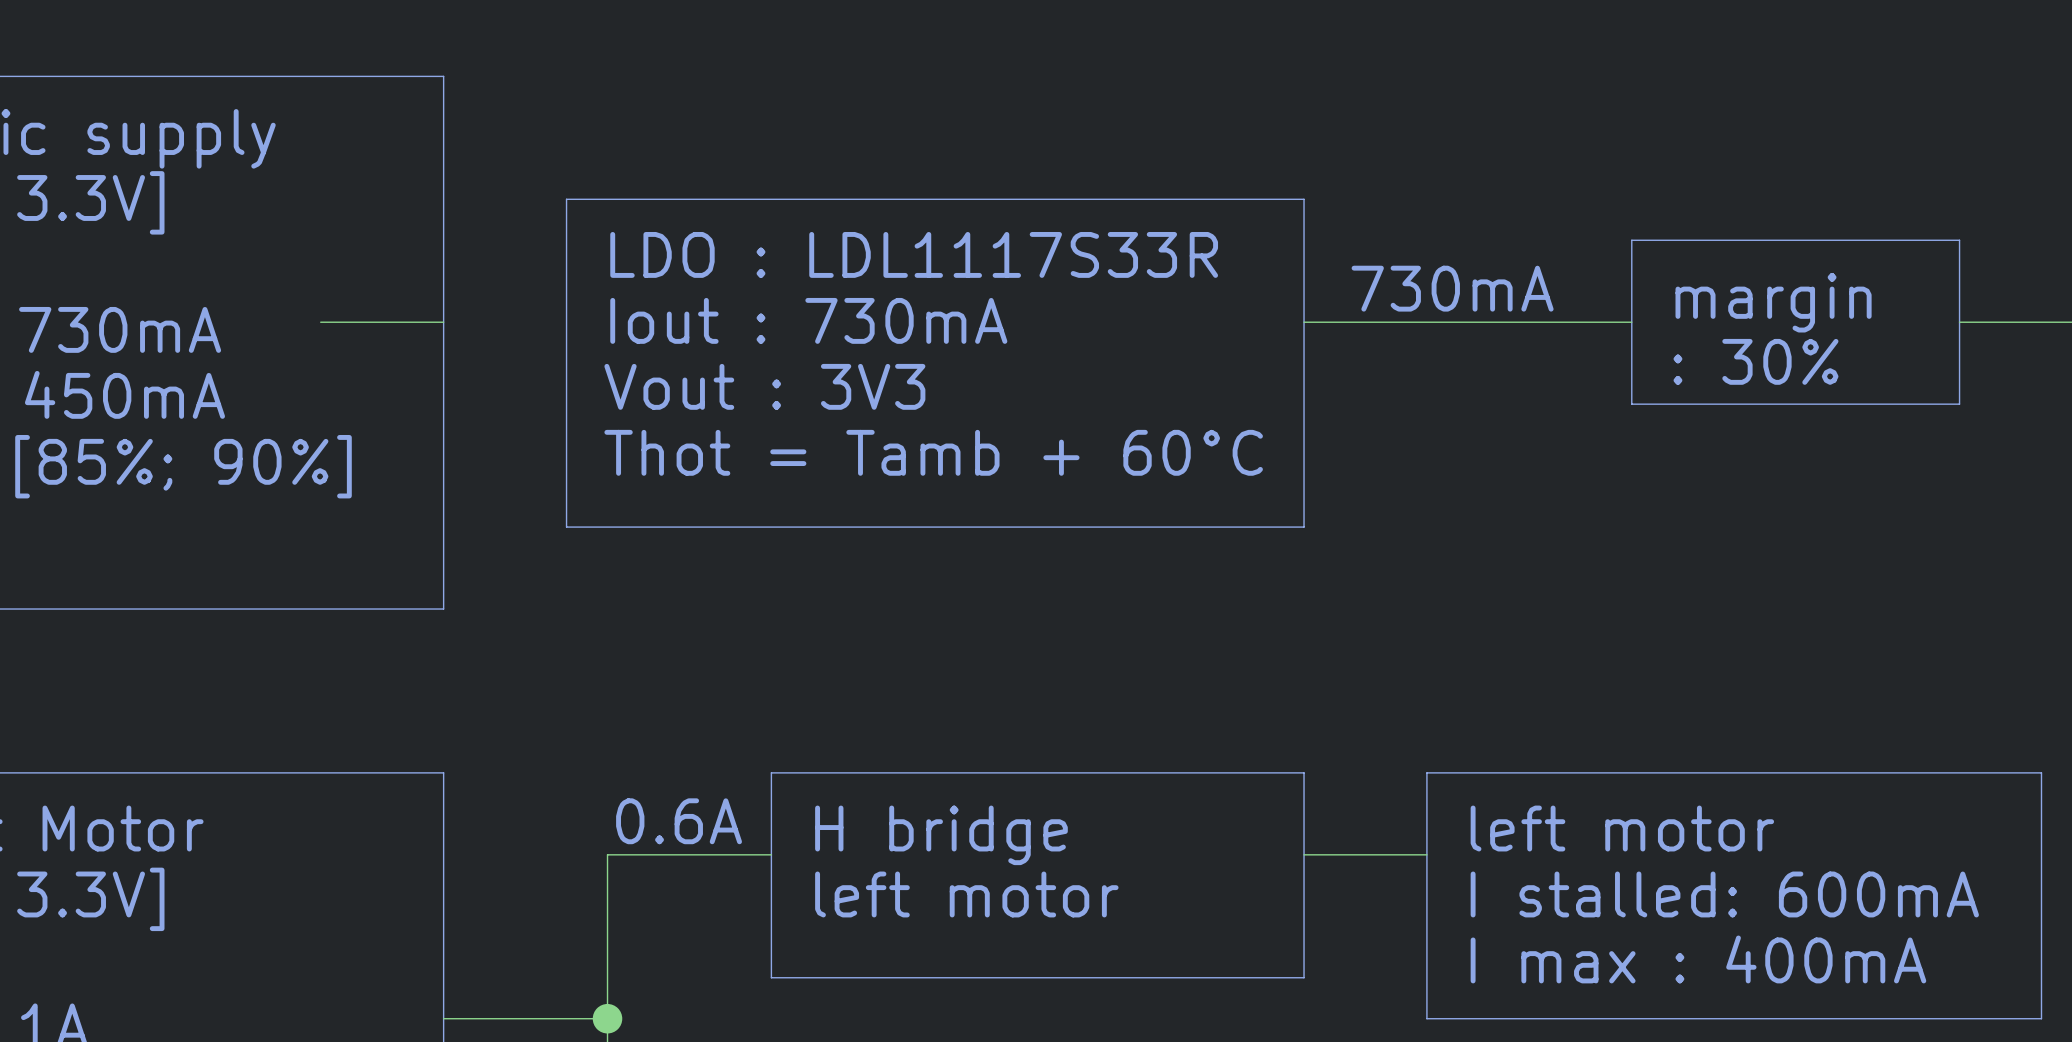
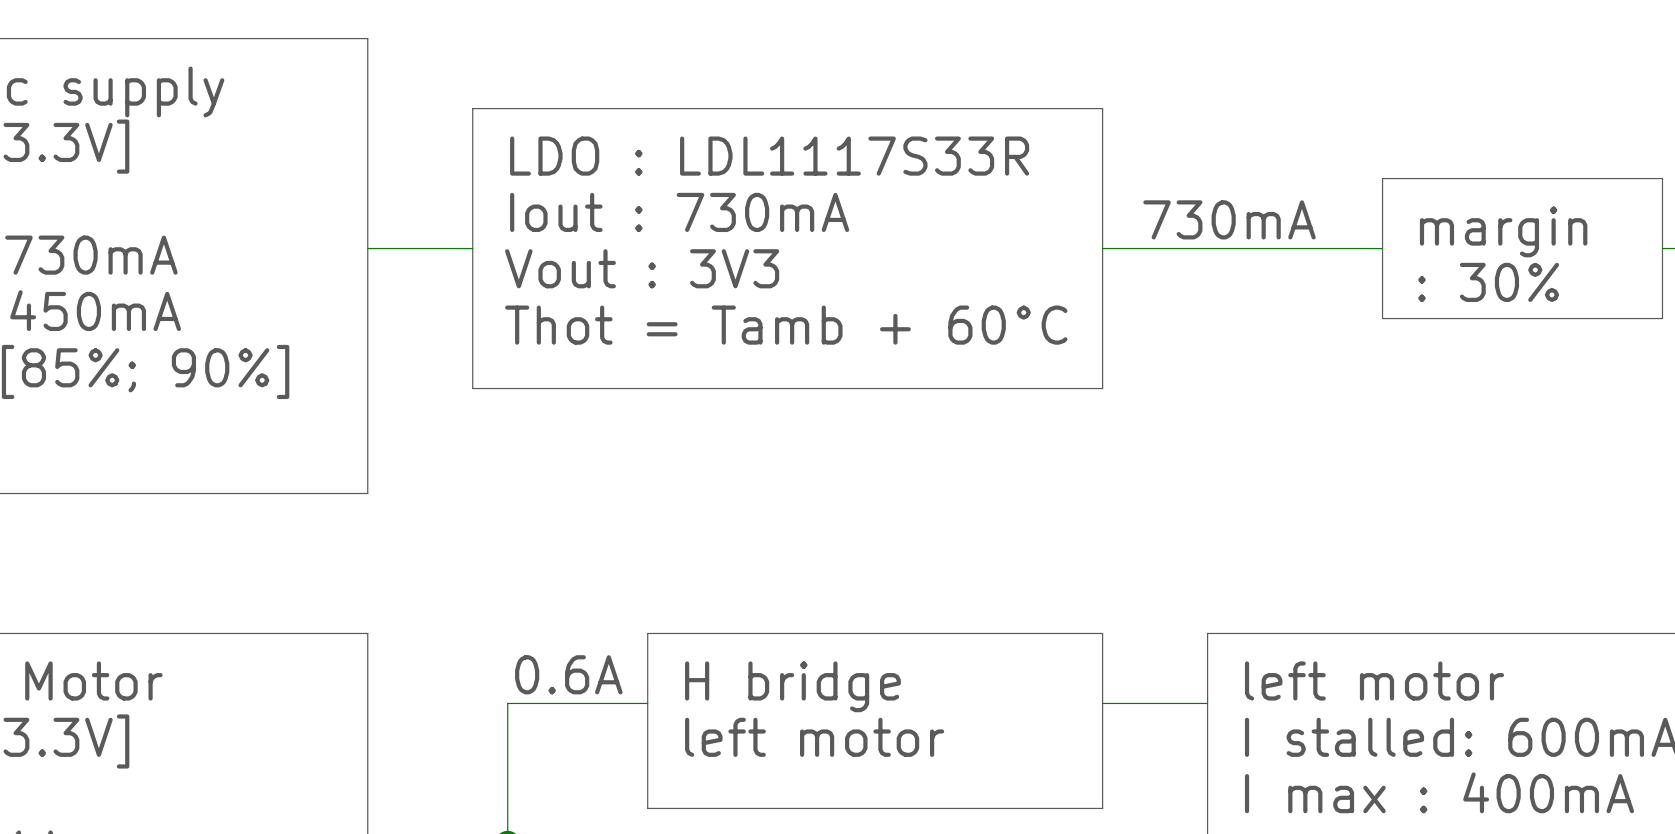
line: (566, 199) (1304, 199) -> (472, 143) (472, 108) (1102, 108) (1102, 143)
text position: LDO : LDL1117S33R (914, 254) -> LDO : LDL1117S33R (769, 156)
text position: Iout : 730mA (808, 320) -> Iout : 730mA (679, 212)
wire: (320, 322) (443, 322) -> (472, 248) (367, 248)
text position: Vout : 3V3 (764, 386) -> Vout : 3V3 (642, 268)
text position: Thot = Tamb + 60°C (933, 452) -> Thot = Tamb + 60°C (786, 325)
line: (566, 486) (566, 527) (1304, 527) (1304, 486) -> (472, 388) (1102, 388)

